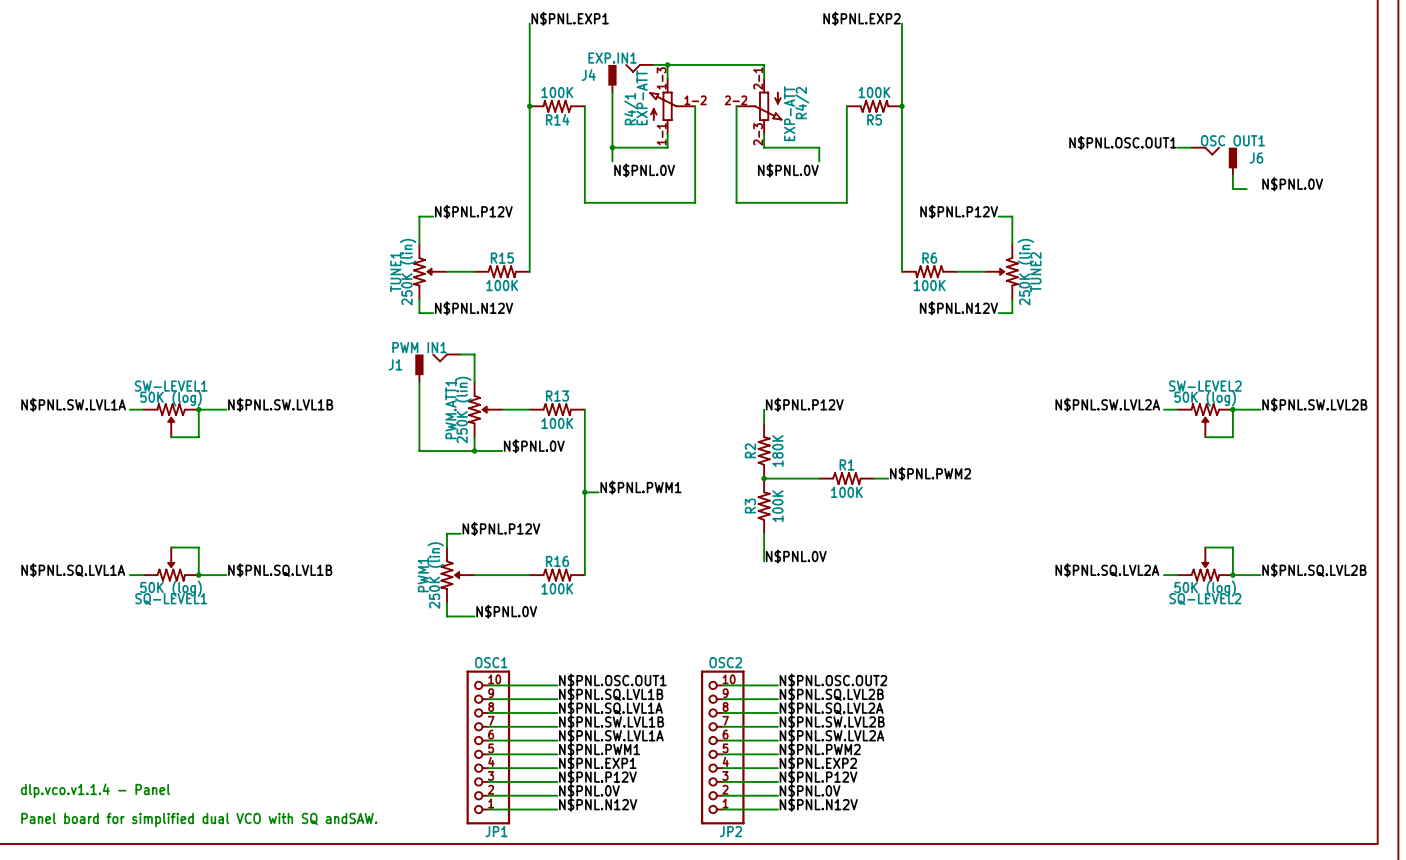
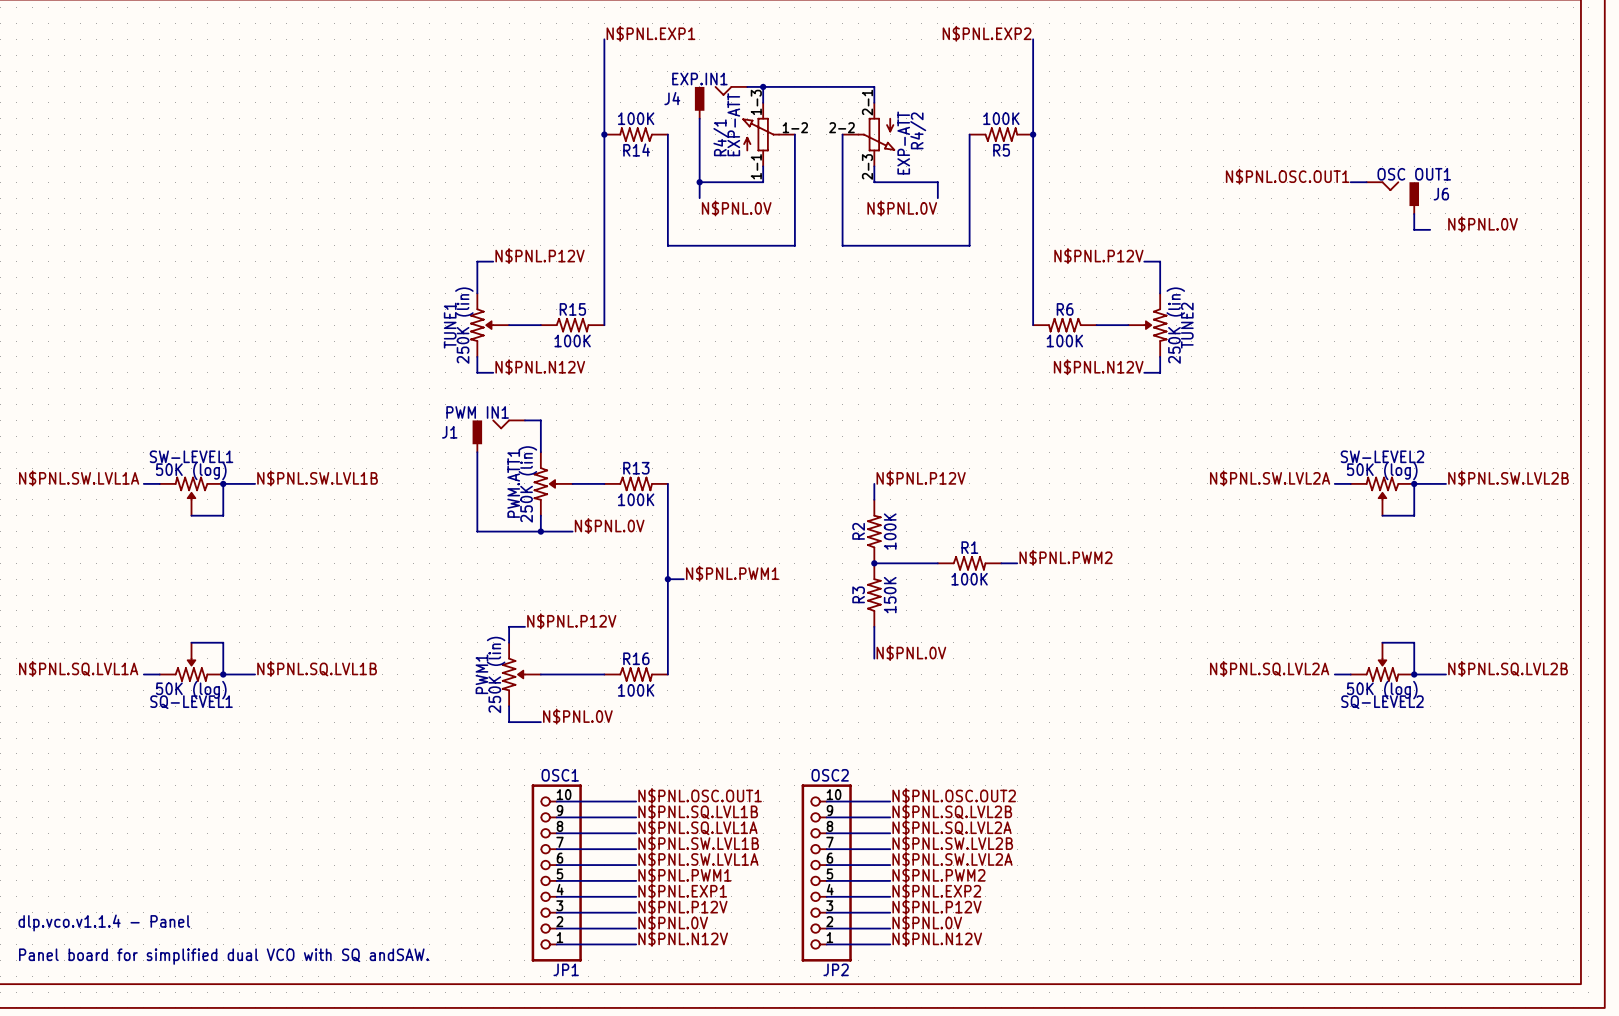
R2 value: 180K (777, 451) -> 100K (890, 531)
R3 value: 100K (777, 506) -> 150K (890, 595)

